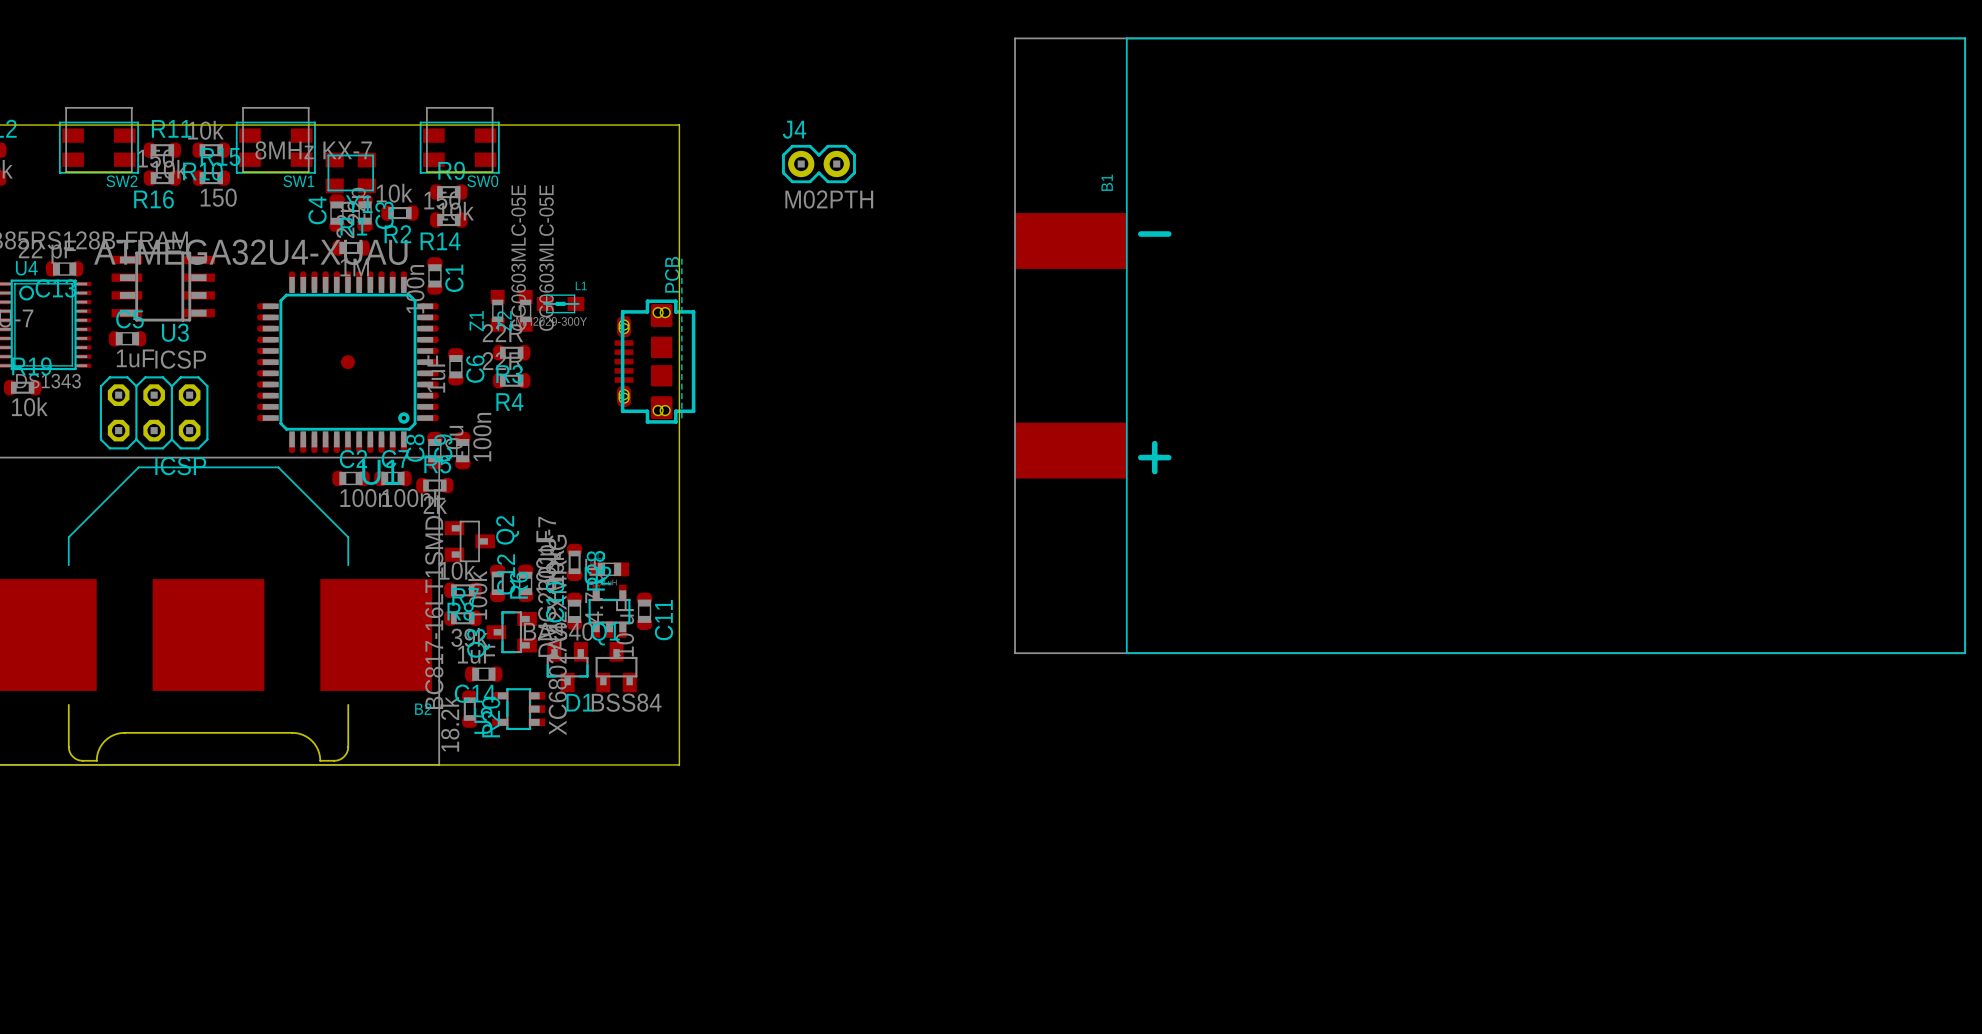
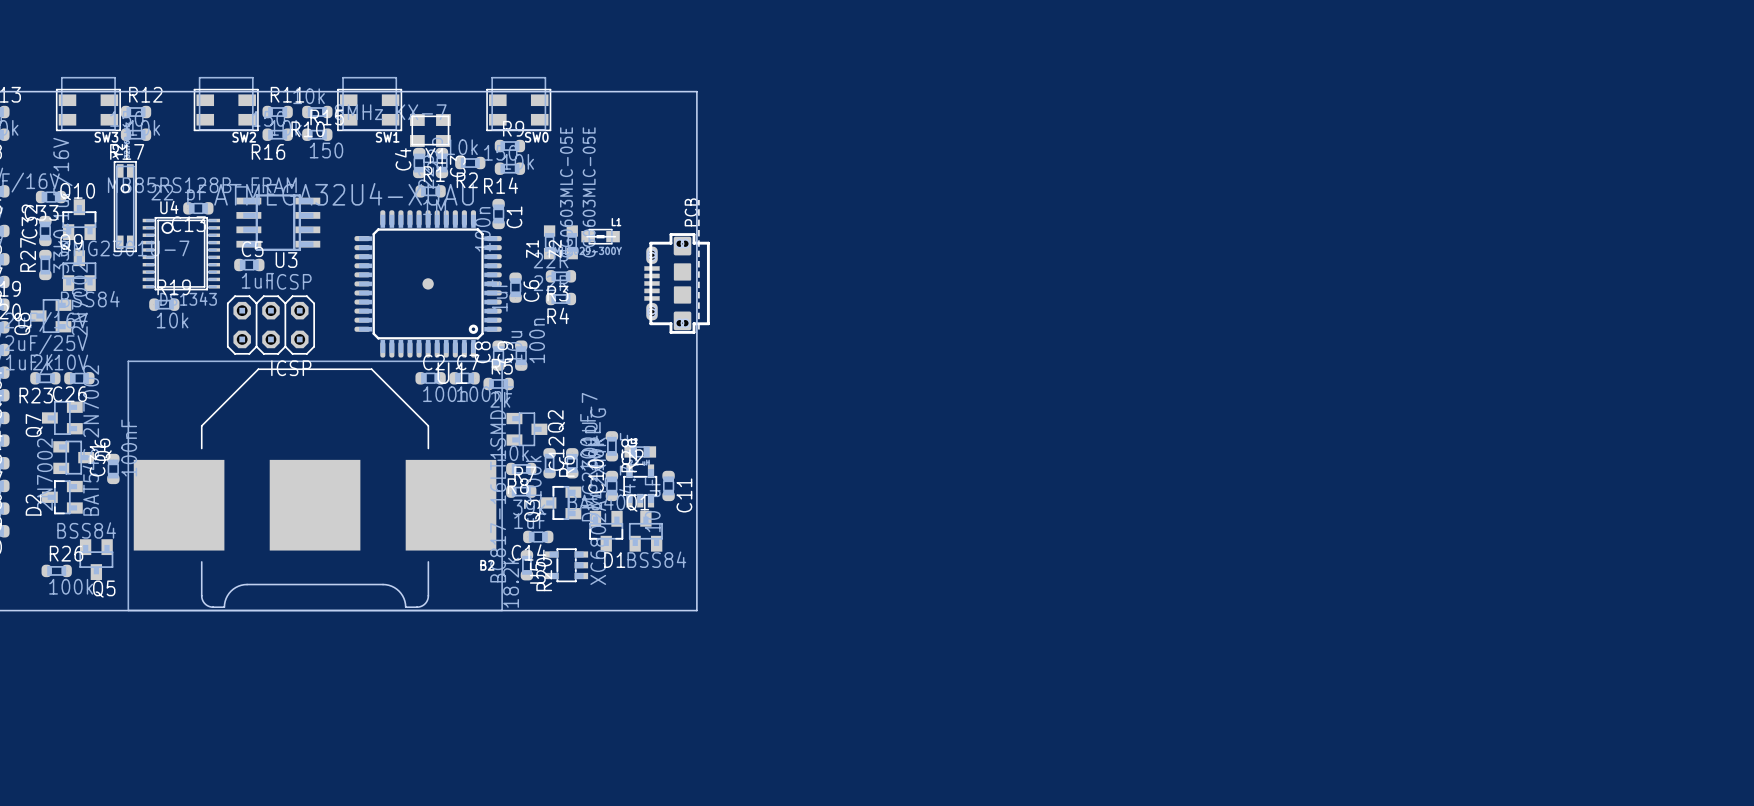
J4: M02PTH (818, 164) -> none
B1: (1490, 345) -> none

